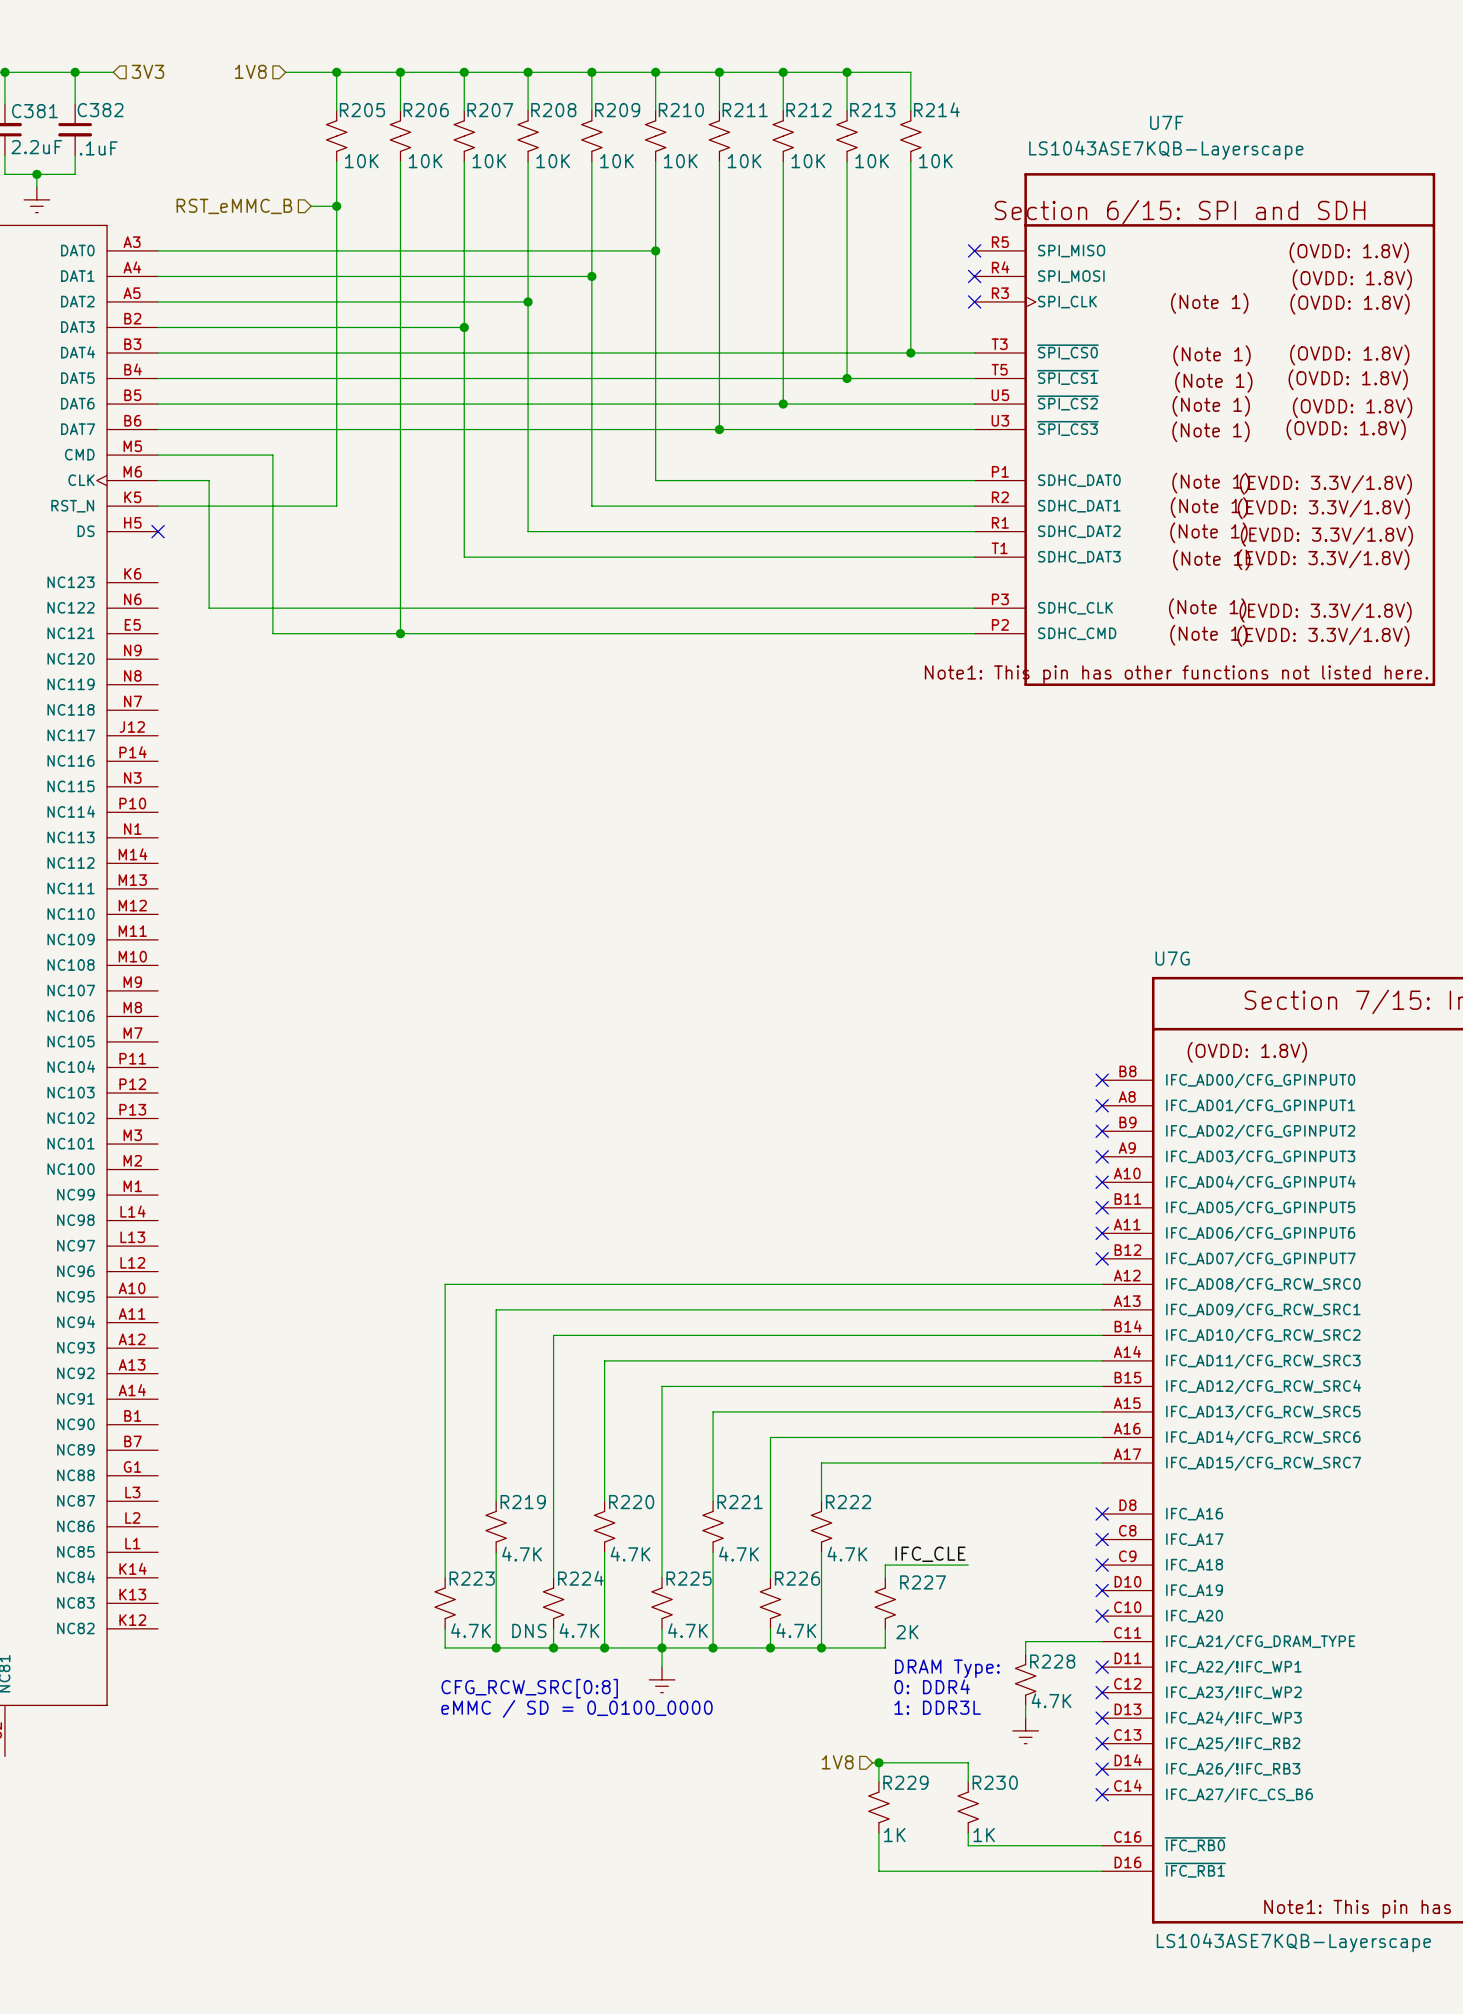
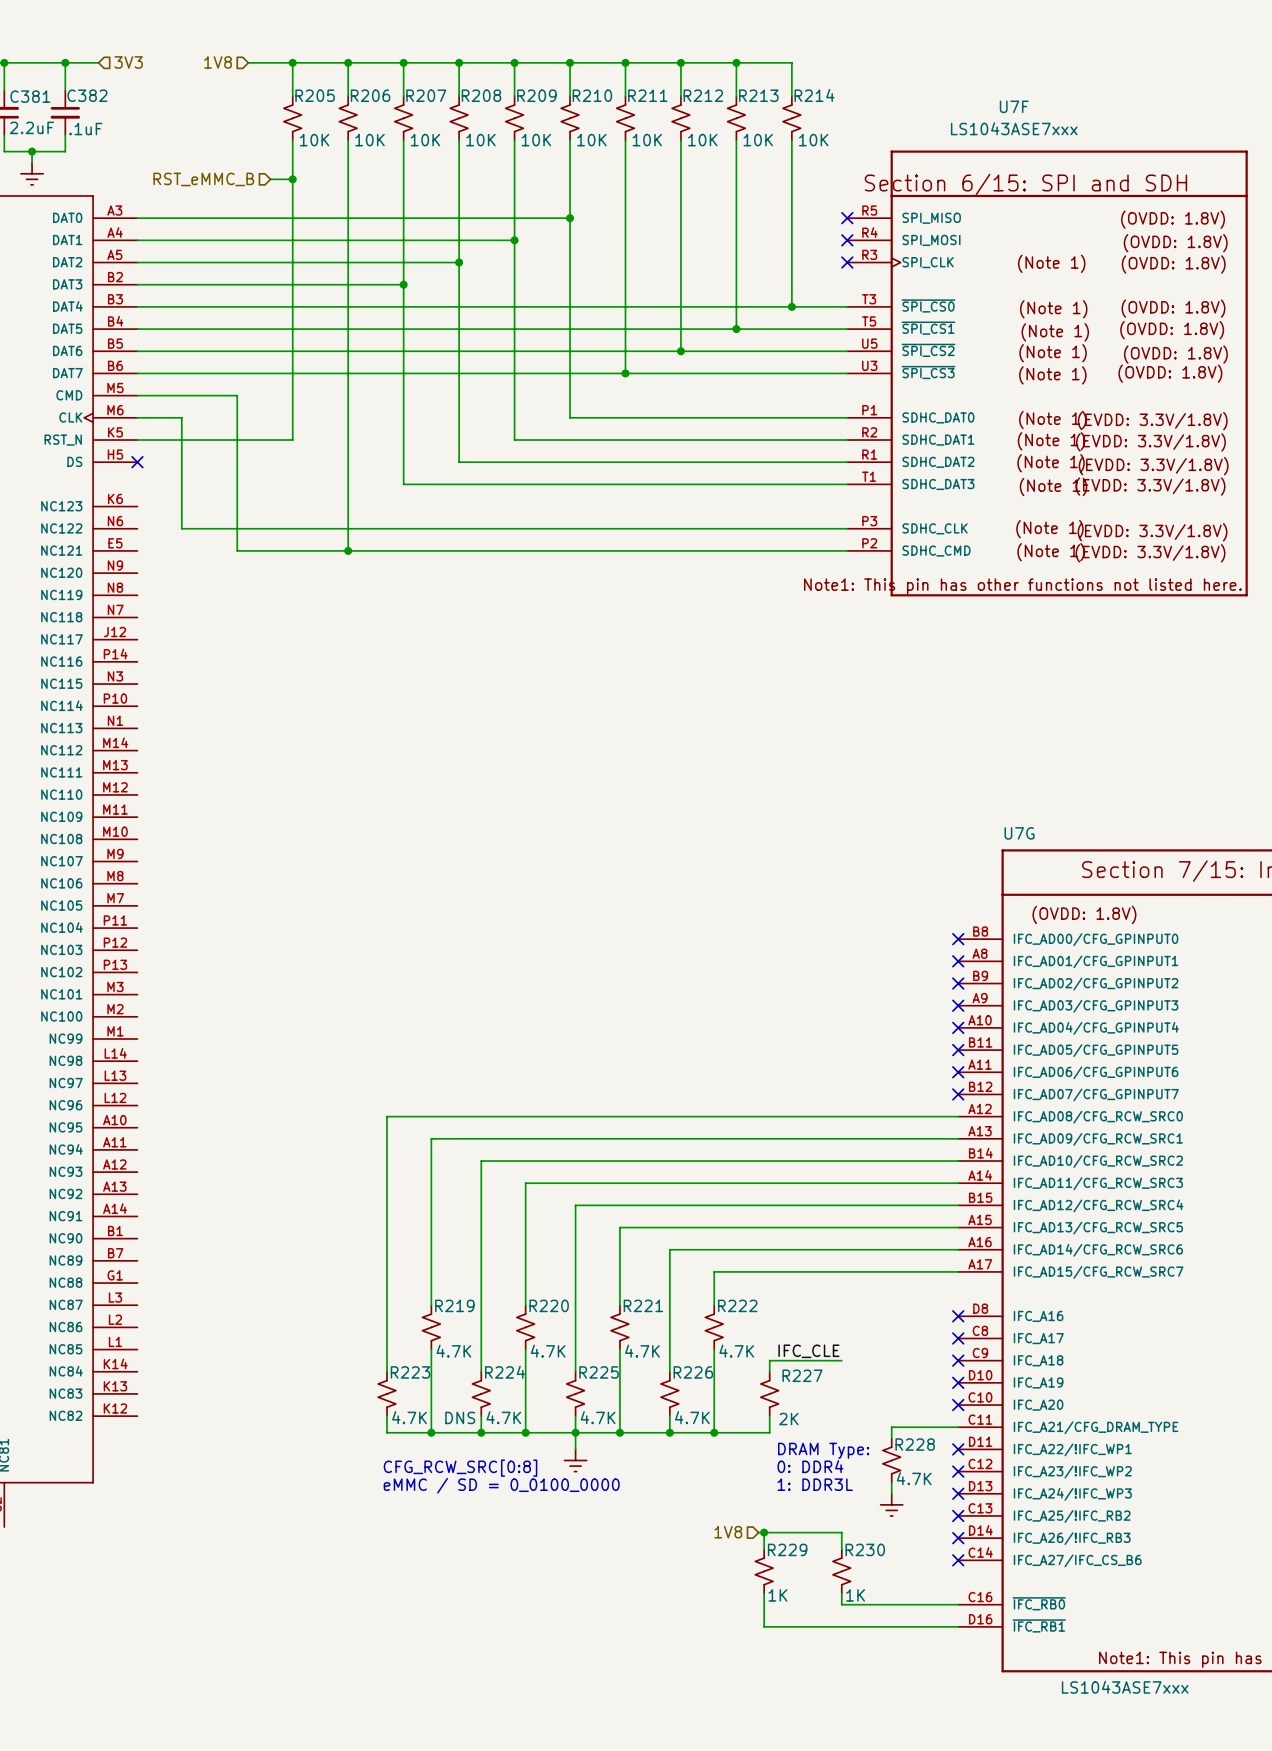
U7F value: LS1043ASE7KQB-Layerscape (1166, 150) -> LS1043ASE7xxx (1014, 128)
U7G value: LS1043ASE7KQB-Layerscape (1293, 1942) -> LS1043ASE7xxx (1125, 1687)

